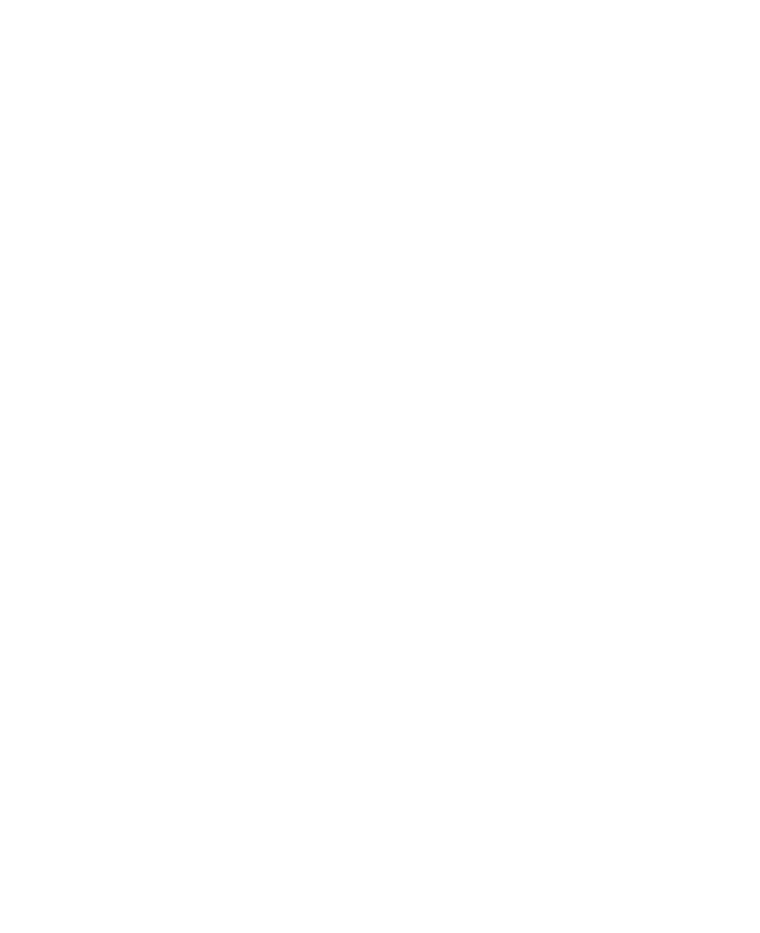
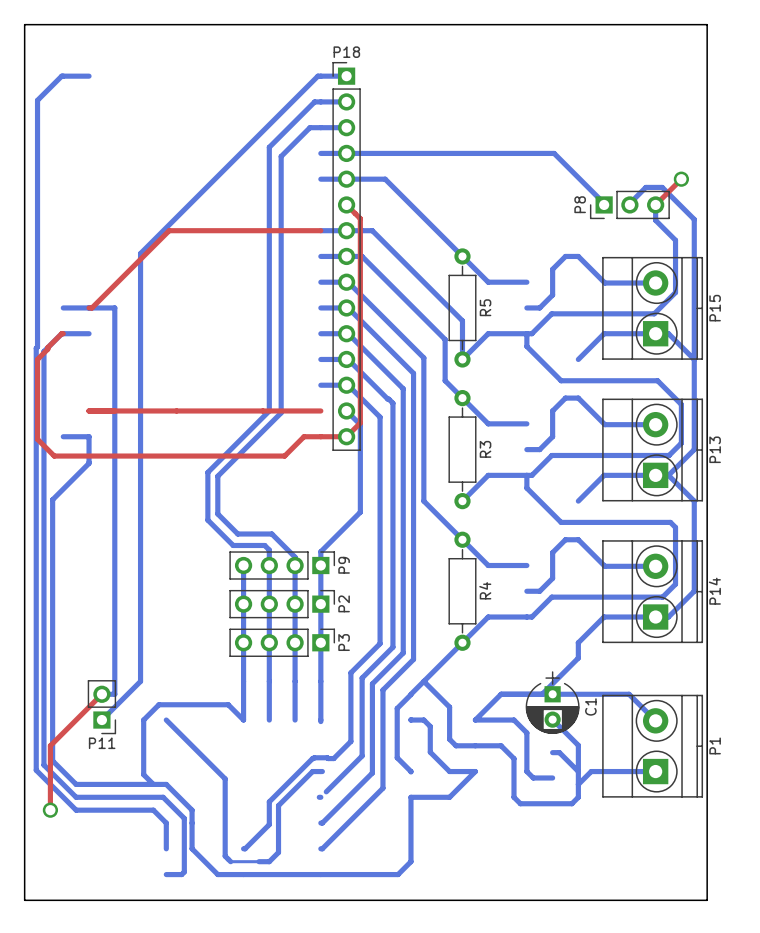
board edge: none -> (24, 24) (24, 900) (707, 900) (707, 24) (24, 24)
bottom track: none -> (89, 76) (61, 76) (37, 100) (36, 770) (76, 810) (153, 810) (166, 823) (166, 848)
bottom track: none -> (346, 76) (317, 76) (140, 253) (140, 681) (101, 720)
bottom track: none -> (346, 101) (314, 101) (269, 147) (269, 410) (207, 472) (207, 520) (233, 545) (264, 545) (269, 550) (269, 720)
bottom track: none -> (346, 127) (309, 127) (281, 156) (281, 412) (217, 476) (217, 513) (237, 534) (271, 534) (295, 557) (295, 720)
bottom track: none -> (320, 153) (554, 153) (604, 204)
bottom track: none -> (320, 179) (385, 179) (488, 282) (526, 282)
top track: none -> (681, 179) (655, 204)
via: none -> (681, 179)
top track: none -> (346, 204) (360, 218) (360, 422) (346, 436) (304, 436) (284, 456) (54, 456) (37, 439) (37, 359) (63, 333)
bottom track: none -> (629, 204) (645, 187) (662, 187) (694, 219) (694, 449) (668, 475)
P8: none -> (629, 204)
bottom track: none -> (655, 204) (655, 220) (675, 240) (675, 292) (654, 313) (551, 313) (531, 333) (488, 333) (462, 359) (462, 320) (372, 230) (320, 230)
top track: none -> (320, 230) (169, 230) (91, 307) (89, 307)
bottom track: none -> (320, 256) (362, 256) (445, 339) (445, 380) (488, 423) (526, 423)
P18: none -> (346, 256)
bottom track: none -> (320, 282) (348, 282) (423, 357) (423, 501) (488, 565) (526, 565)
bottom track: none -> (655, 283) (604, 283) (578, 256) (565, 256) (552, 269) (552, 295) (539, 307) (526, 307)
bottom track: none -> (63, 307) (114, 307) (114, 694) (101, 694)
bottom track: none -> (320, 307) (348, 307) (413, 373) (413, 659) (382, 690) (382, 788) (320, 848)
R5: none -> (462, 307)
P15: none -> (652, 308)
bottom track: none -> (89, 333) (61, 333) (43, 351) (43, 765) (76, 797) (163, 797) (184, 818) (184, 871) (181, 874) (166, 874)
bottom track: none -> (320, 333) (348, 333) (403, 388) (403, 653) (372, 683) (372, 773) (320, 823)
bottom track: none -> (526, 333) (526, 346) (561, 380) (657, 380) (681, 404) (681, 443) (669, 455) (551, 455) (531, 475) (488, 475) (462, 501)
bottom track: none -> (320, 359) (348, 359) (392, 403) (392, 647) (362, 678) (362, 756) (326, 791)
bottom track: none -> (578, 359) (604, 333) (668, 333) (694, 359)
bottom track: none -> (320, 385) (348, 385) (380, 417) (380, 643) (350, 672) (350, 741) (333, 758) (312, 758) (269, 801) (269, 824) (243, 848)
top track: none -> (89, 410) (320, 410)
bottom track: none -> (346, 410) (360, 424) (360, 512) (320, 551) (320, 721)
bottom track: none -> (655, 424) (604, 424) (578, 398) (565, 398) (552, 410) (552, 436) (539, 449) (526, 449)
bottom track: none -> (63, 436) (89, 436) (89, 463) (52, 499) (52, 760) (76, 784) (166, 784) (192, 810) (192, 848) (217, 874) (398, 874) (410, 861) (410, 797) (449, 797) (475, 771) (449, 771) (430, 752) (430, 726) (423, 720) (410, 719)
R3: none -> (462, 449)
P13: none -> (652, 450)
bottom track: none -> (526, 475) (526, 488) (561, 522) (670, 522) (675, 527) (675, 584) (662, 597) (551, 597) (531, 617) (488, 617) (410, 694)
bottom track: none -> (668, 475) (604, 475) (578, 501)
bottom track: none -> (668, 475) (694, 501) (694, 591) (668, 617) (604, 617) (578, 642) (578, 658) (542, 694)
bottom track: none -> (243, 565) (243, 720) (228, 704) (158, 704) (143, 720) (143, 774) (153, 784)
P9: none -> (282, 565)
bottom track: none -> (655, 566) (604, 566) (578, 539) (565, 539) (552, 552) (552, 578) (539, 591) (526, 591)
R4: none -> (462, 591)
P14: none -> (652, 591)
P2: none -> (282, 604)
P3: none -> (282, 642)
bottom track: none -> (423, 681) (449, 707) (449, 739) (456, 745) (501, 745) (513, 758) (513, 797) (520, 803) (571, 803) (578, 797) (578, 745) (552, 720)
top track: none -> (101, 694) (50, 745) (50, 810)
bottom track: none -> (410, 694) (397, 708) (397, 757) (410, 771)
C1: none -> (552, 702)
P11: none -> (101, 707)
bottom track: none -> (166, 720) (225, 778) (225, 856) (230, 861) (269, 861) (278, 852) (278, 805) (312, 771) (322, 771)
bottom track: none -> (655, 720) (629, 694) (501, 694) (475, 720) (513, 720) (526, 732) (526, 771) (533, 777) (552, 777)
P1: none -> (652, 746)
bottom track: none -> (552, 752) (559, 752) (578, 771)
bottom track: none -> (655, 771) (591, 771) (578, 784)
bottom track: none -> (319, 797) (320, 797)
via: none -> (50, 810)

